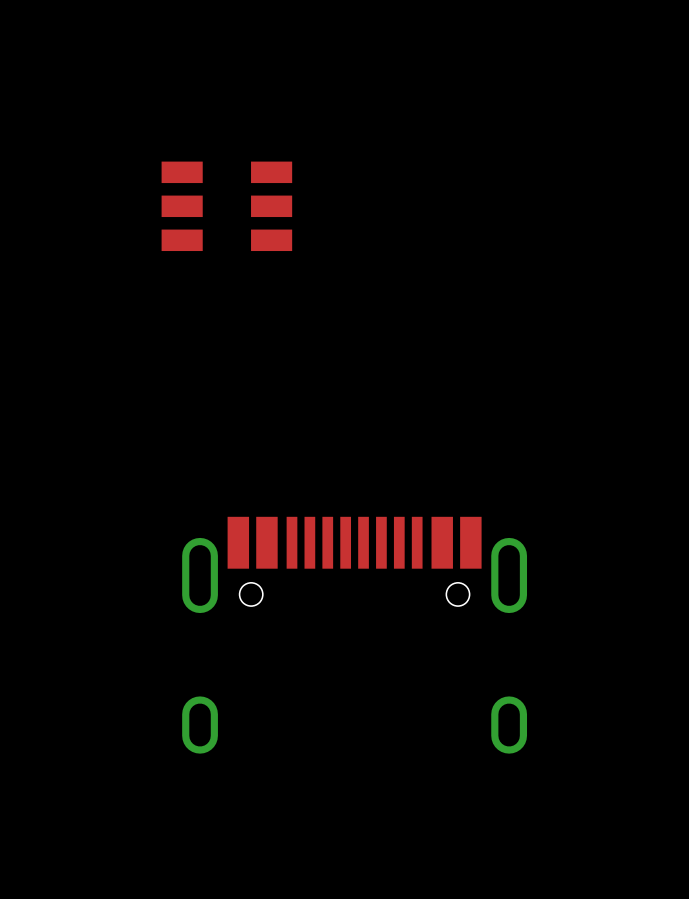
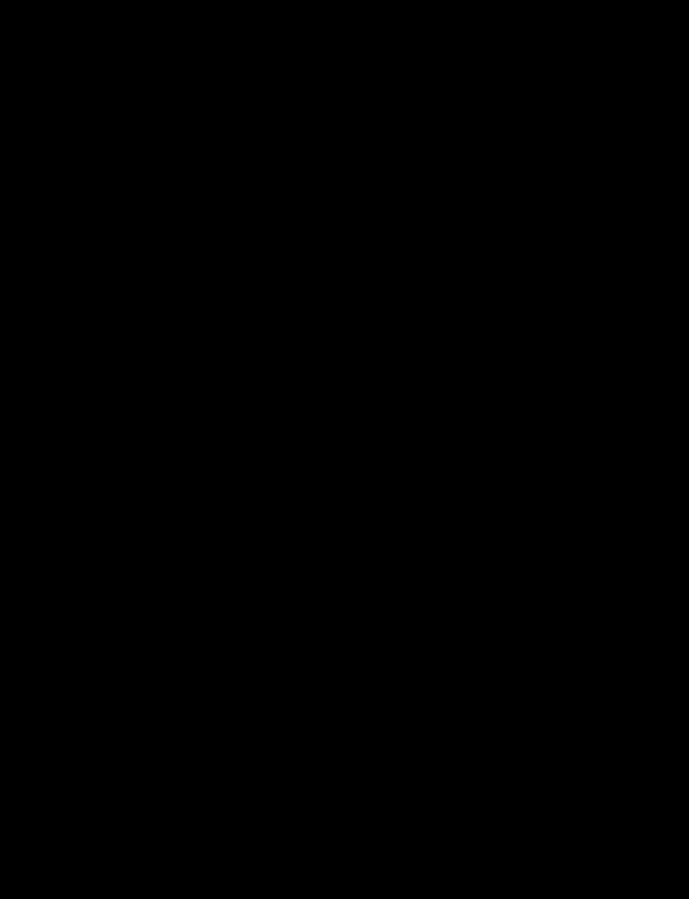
part: (226, 206) -> none
part: (354, 635) -> none

